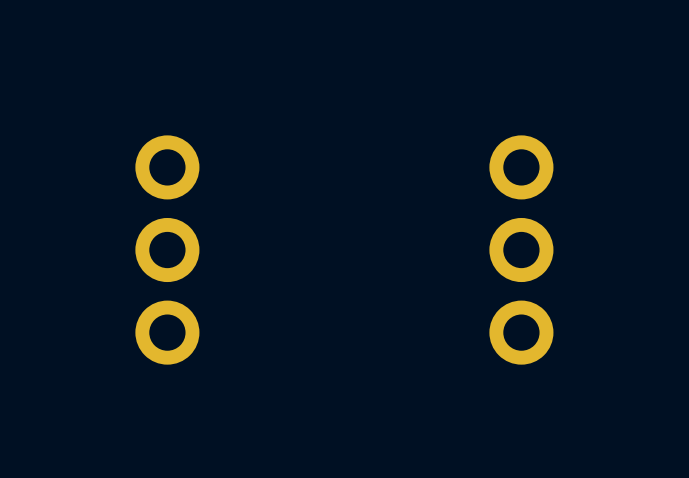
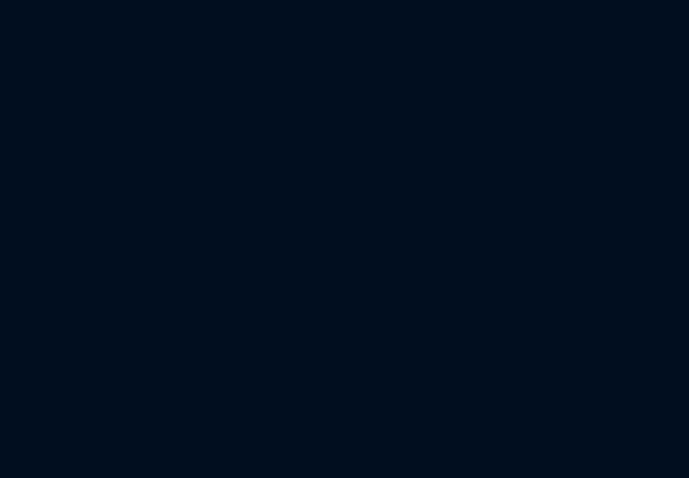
part: (167, 250) -> none
part: (521, 250) -> none

